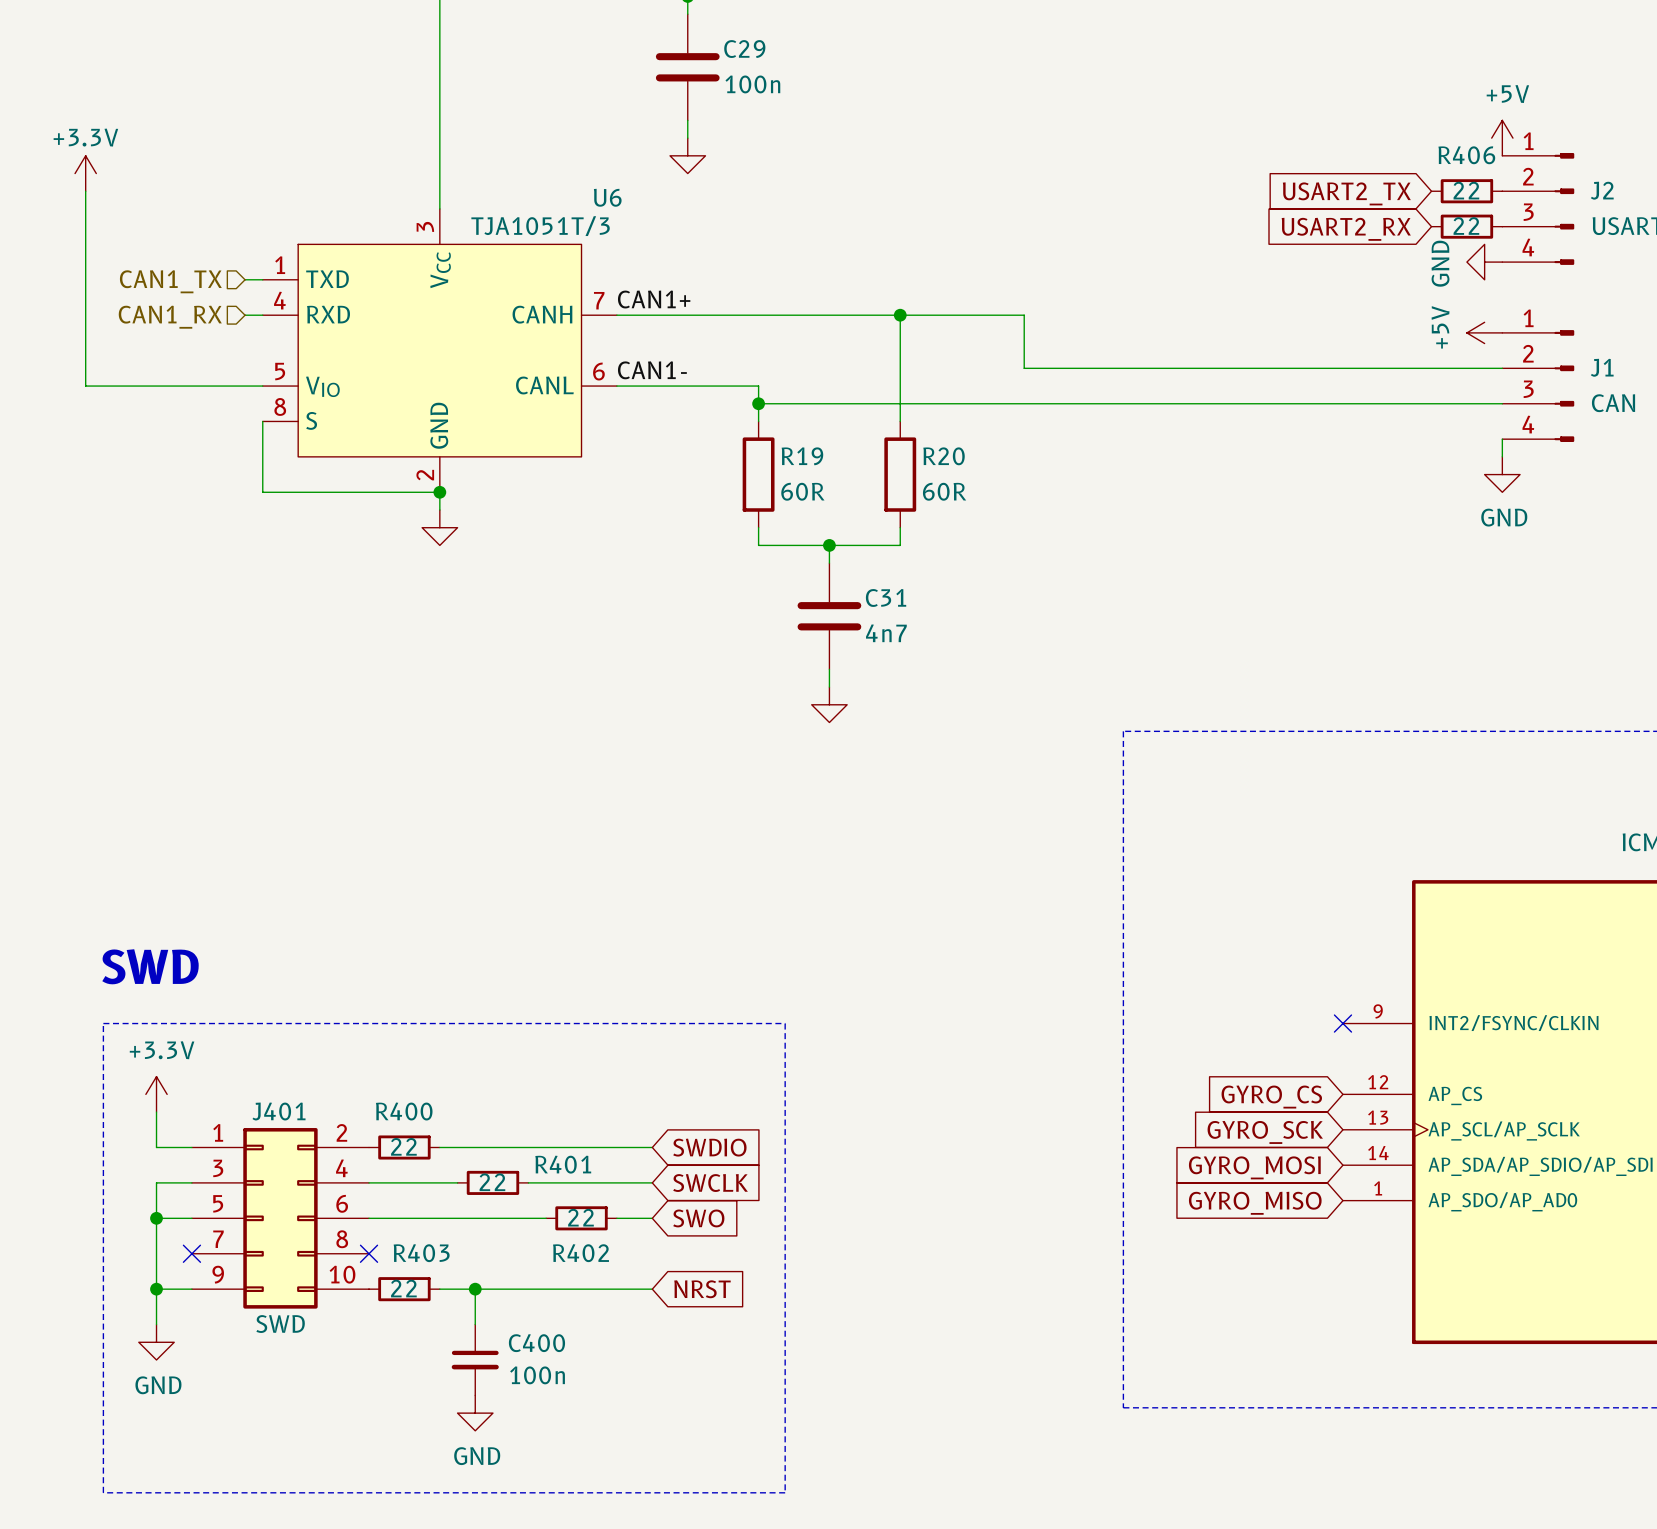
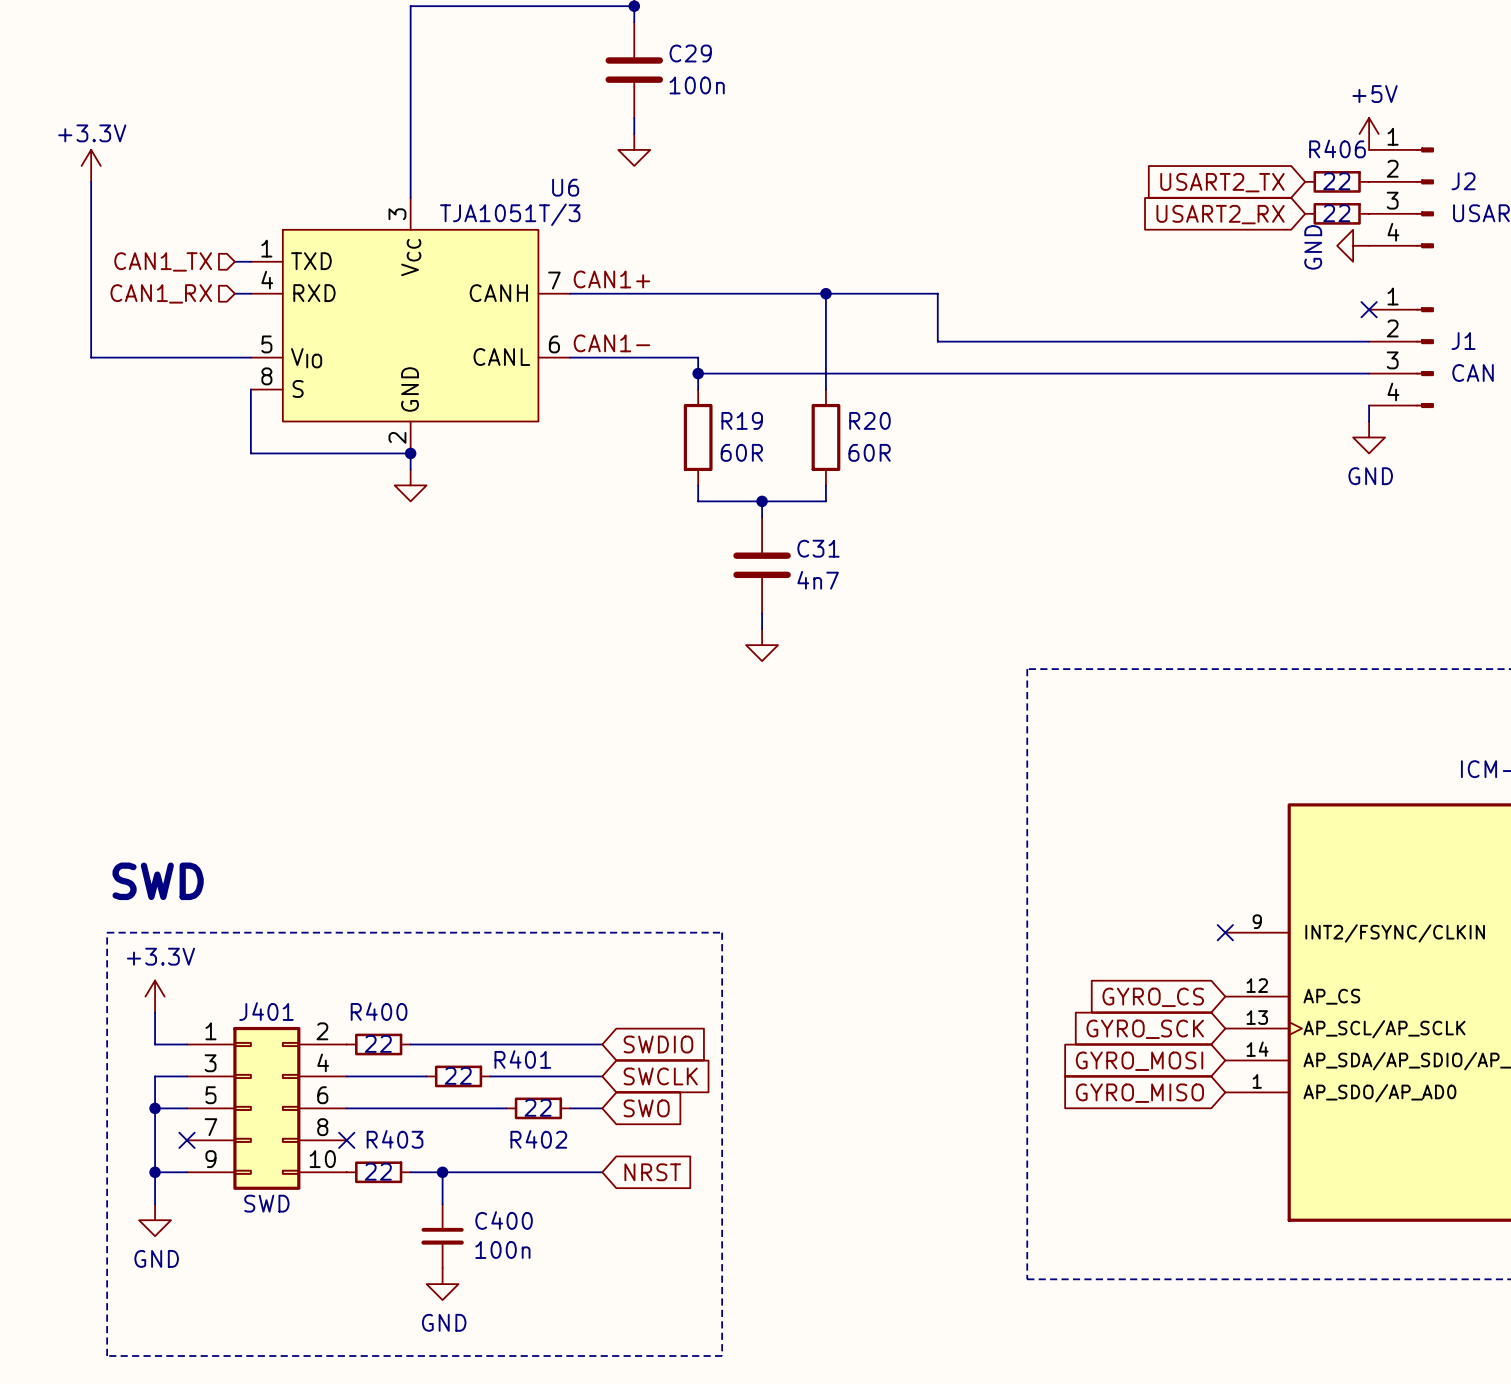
power symbol: +5V (1484, 332) -> none
no-connect mark: none -> (1369, 309)

